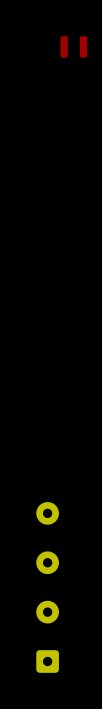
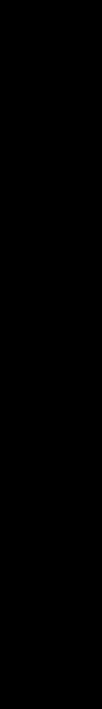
part: (73, 46) -> none
part: (47, 587) -> none

